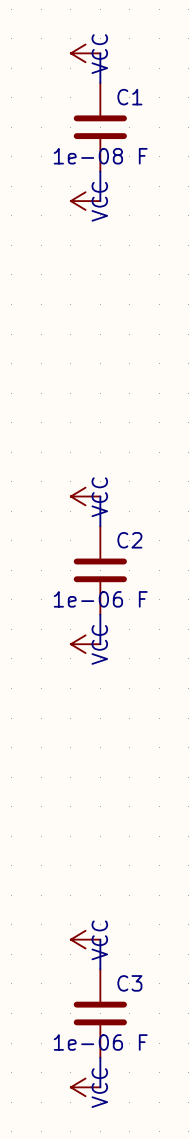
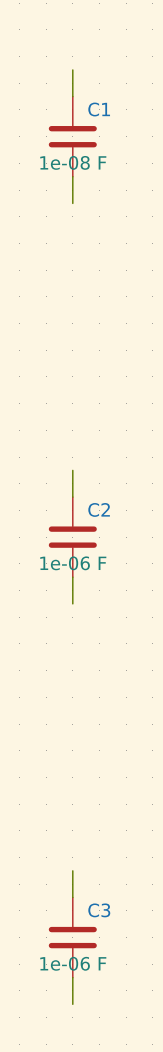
power symbol: VCC (85, 53) -> none
power symbol: VCC (85, 201) -> none
power symbol: VCC (85, 496) -> none
power symbol: VCC (85, 644) -> none
power symbol: VCC (85, 939) -> none
power symbol: VCC (85, 1087) -> none

